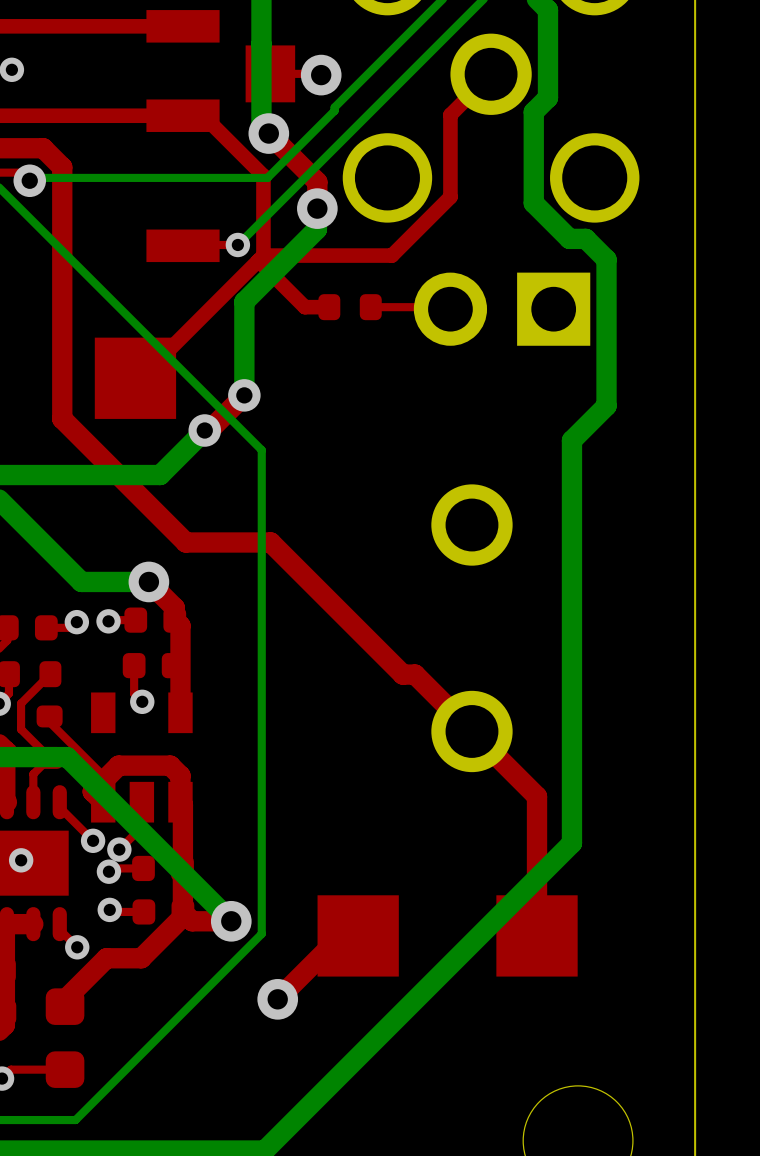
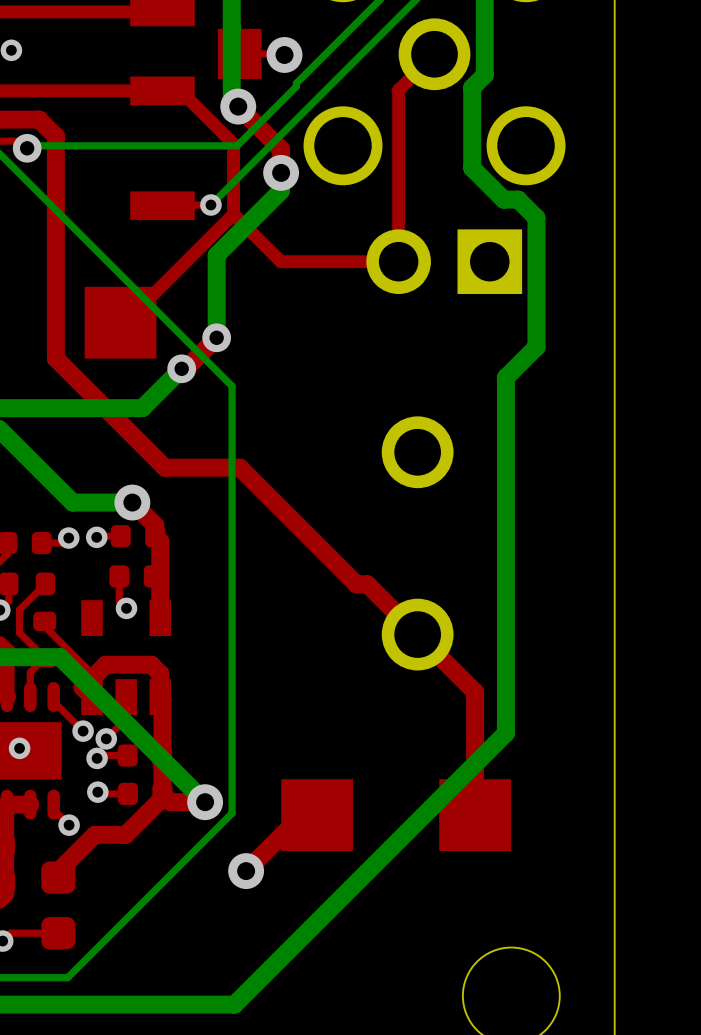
top track: (450, 197) (391, 255) (263, 255) -> (398, 162) (398, 261) (280, 261) (233, 214)
top track: (258, 260) (304, 307) (329, 307) -> none
part: (350, 307) -> none

